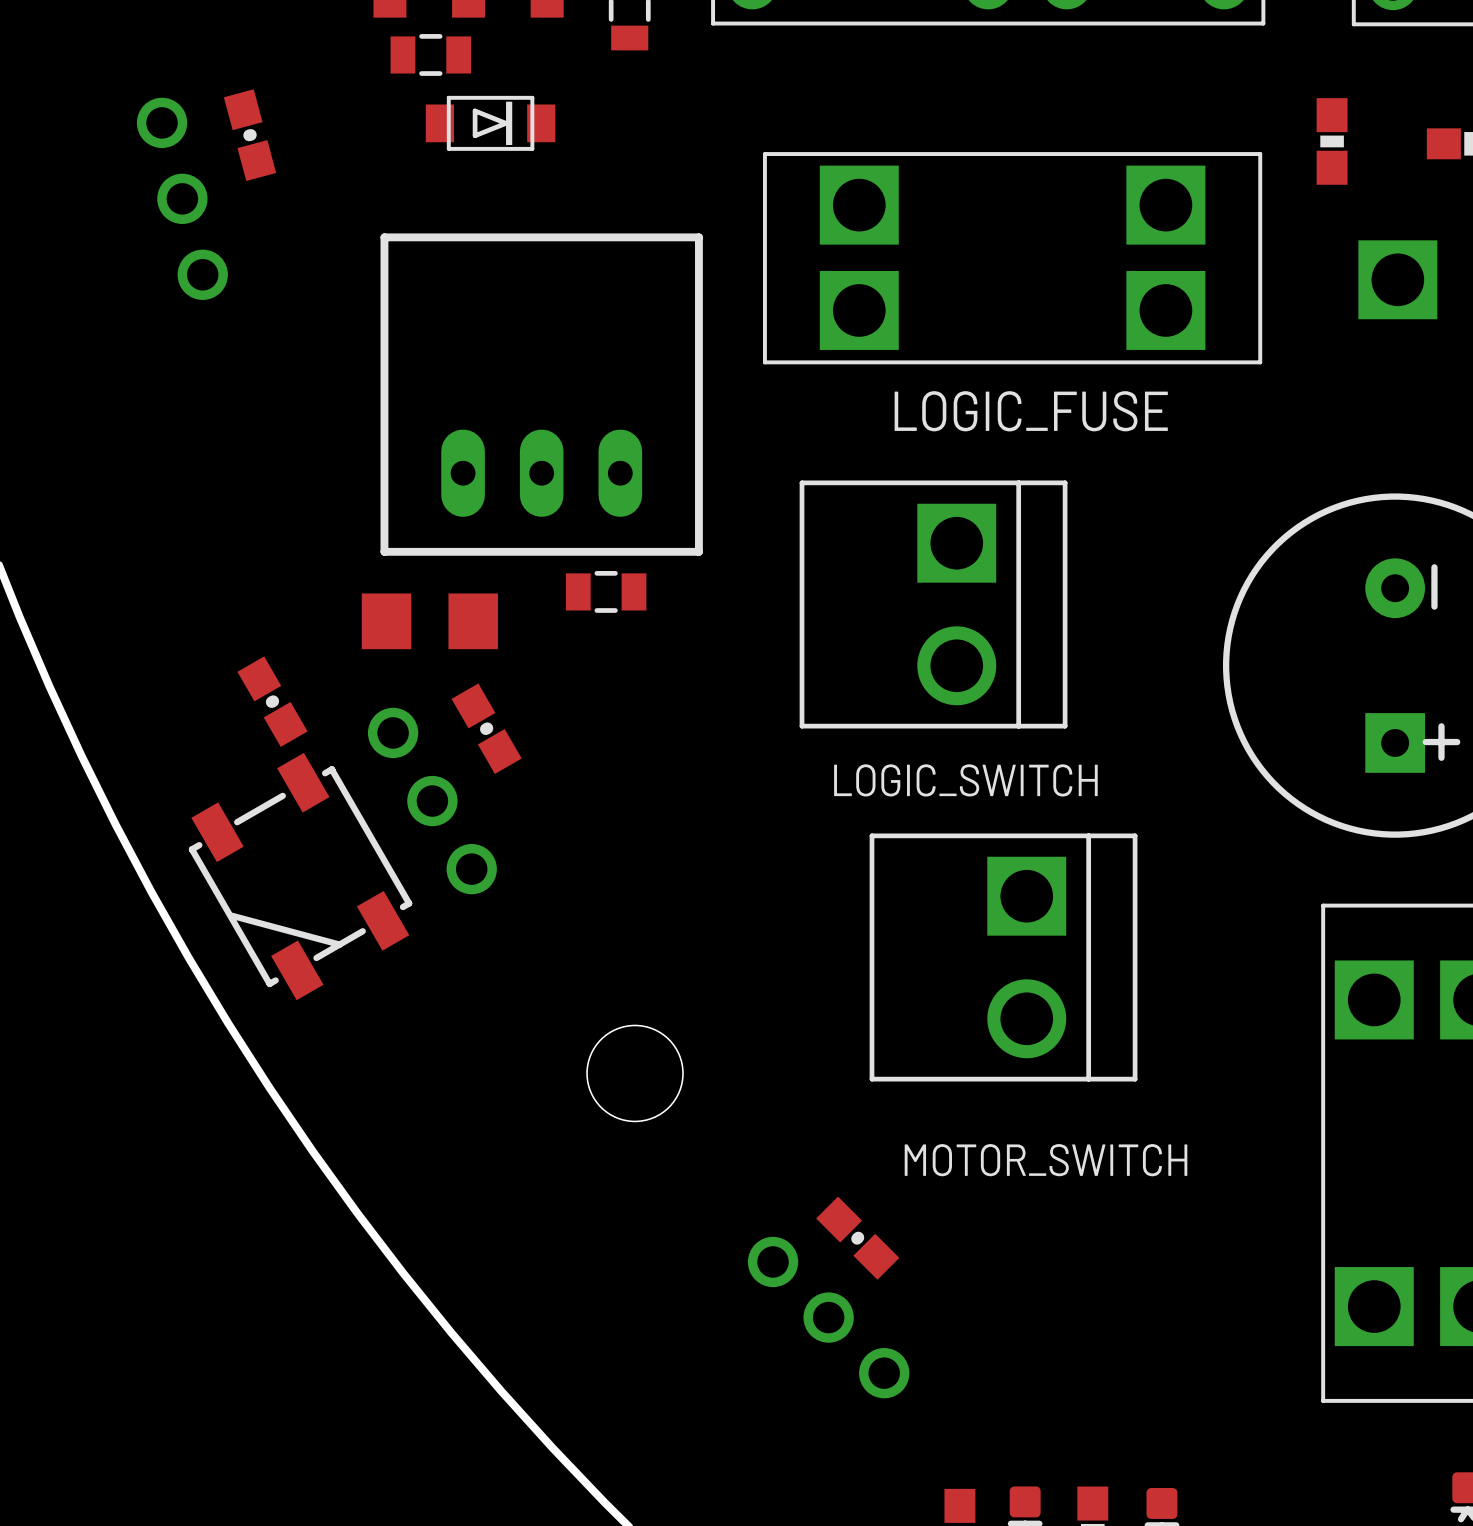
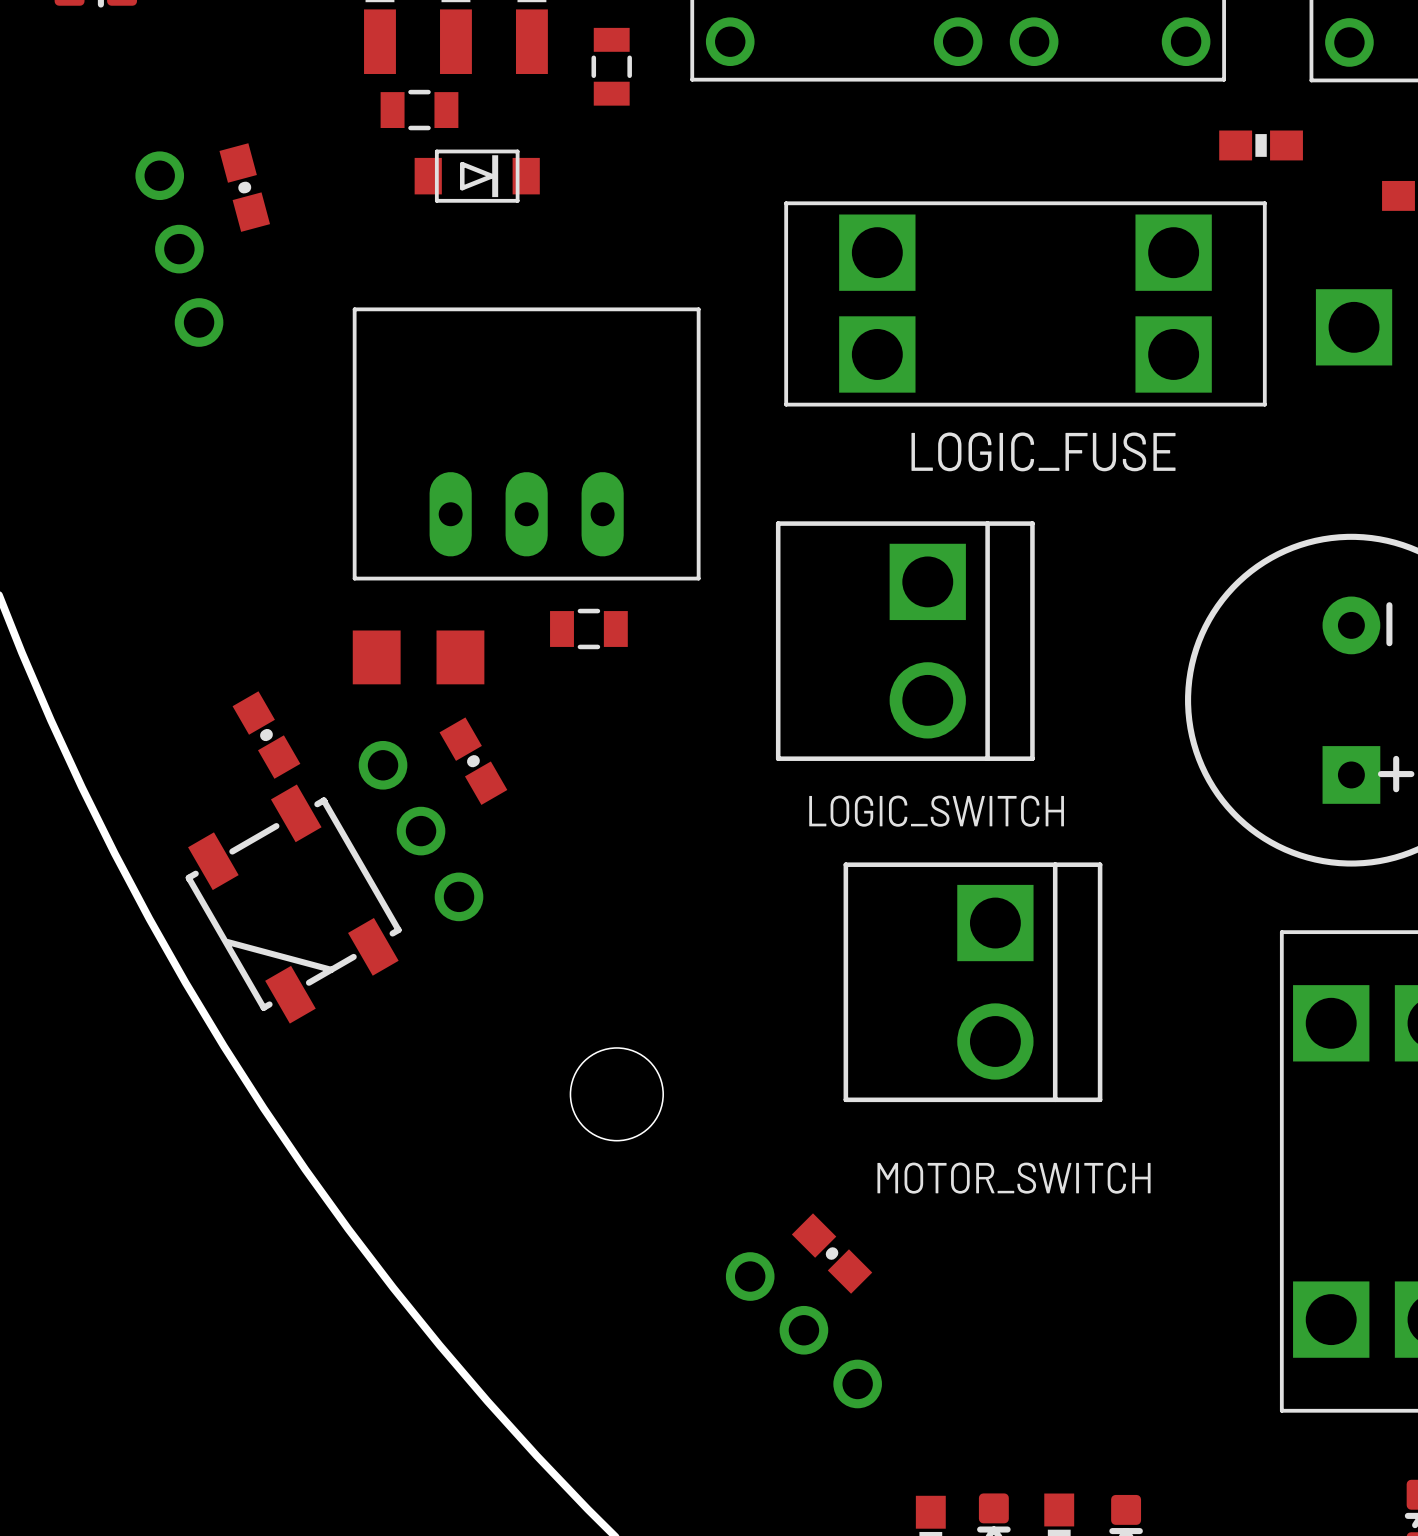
part rotation: 0° (1332, 141) -> 90° clockwise (1261, 145)
part position: (1332, 141) -> (1261, 145)
part footprint: [380, 233, 703, 556] -> [352, 307, 701, 581]
LOGIC_FUSE position: (1012, 258) -> (1025, 303)

